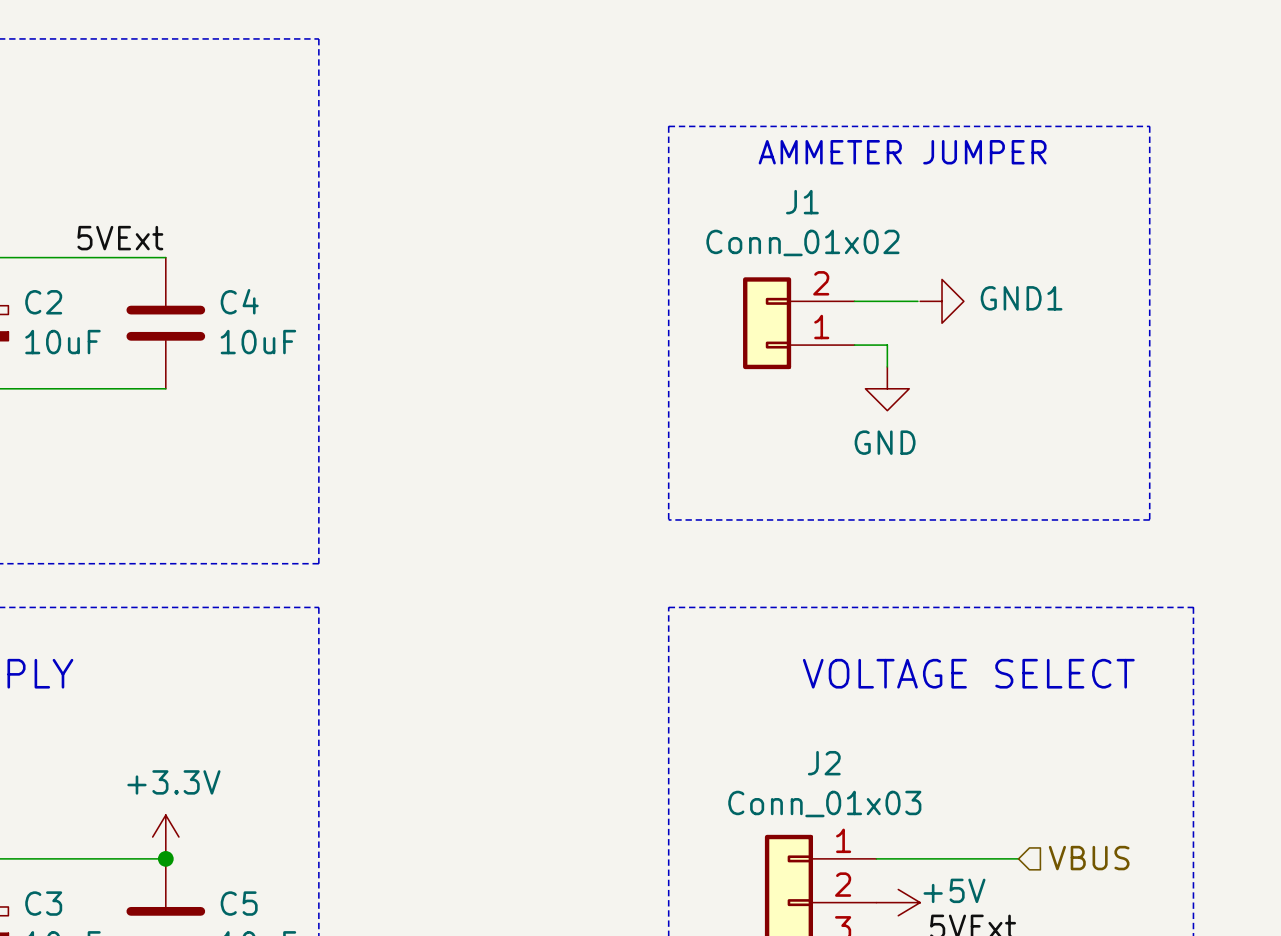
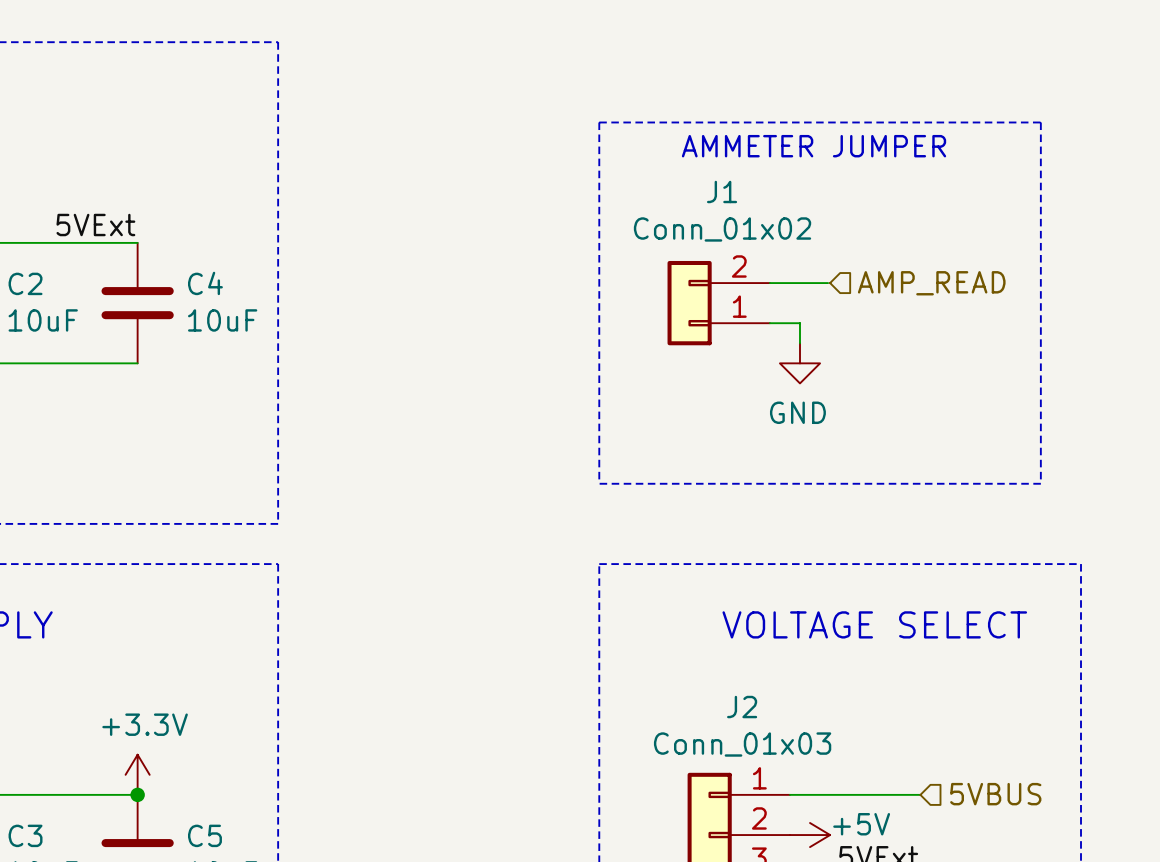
power symbol: GND1 (942, 301) -> none
hierarchical label: none -> AMP_READ (931, 283)
hierarchical label: VBUS (1089, 858) -> 5VBUS (995, 794)

